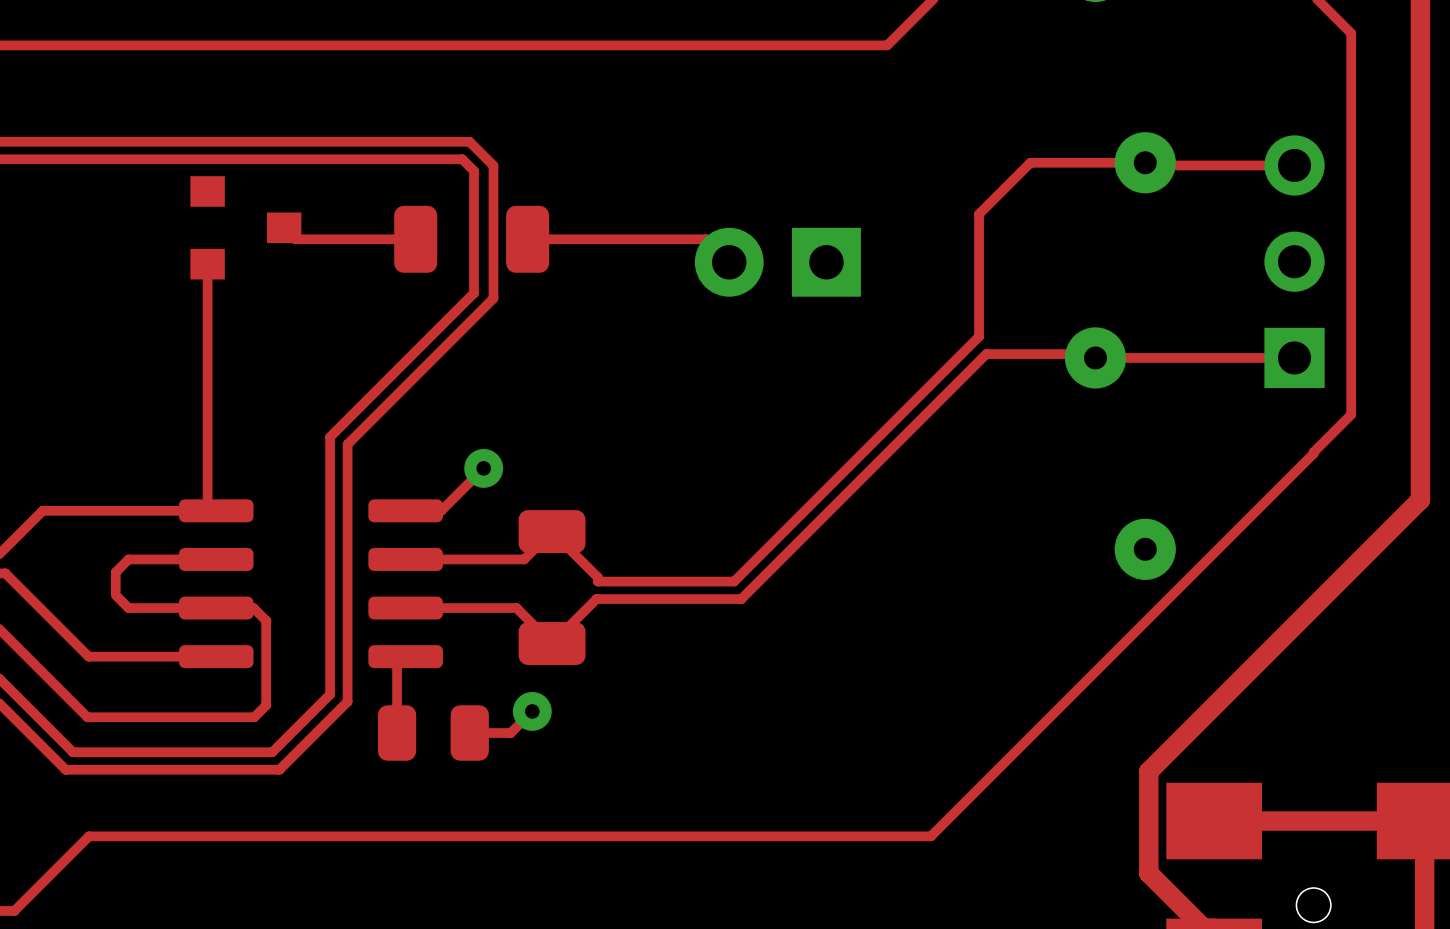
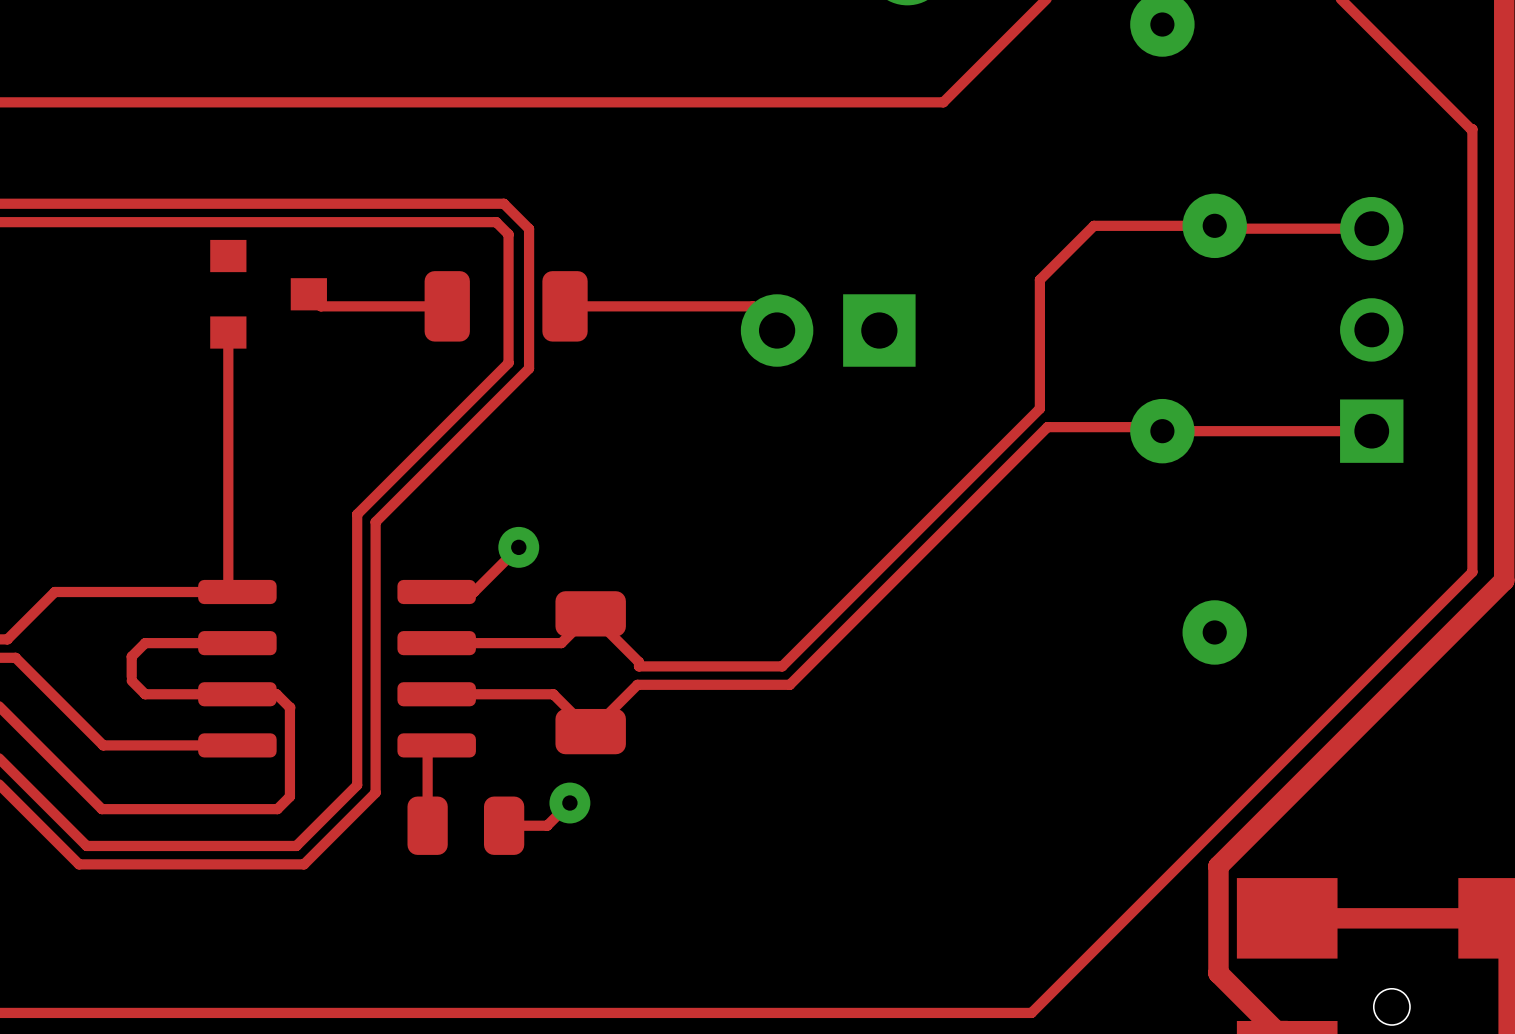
top track: (1351, 33) (1351, 414) (930, 836) (88, 836) (14, 910) -> (1431, 89) (1472, 129) (1472, 572) (1031, 1012) (25, 1012)

